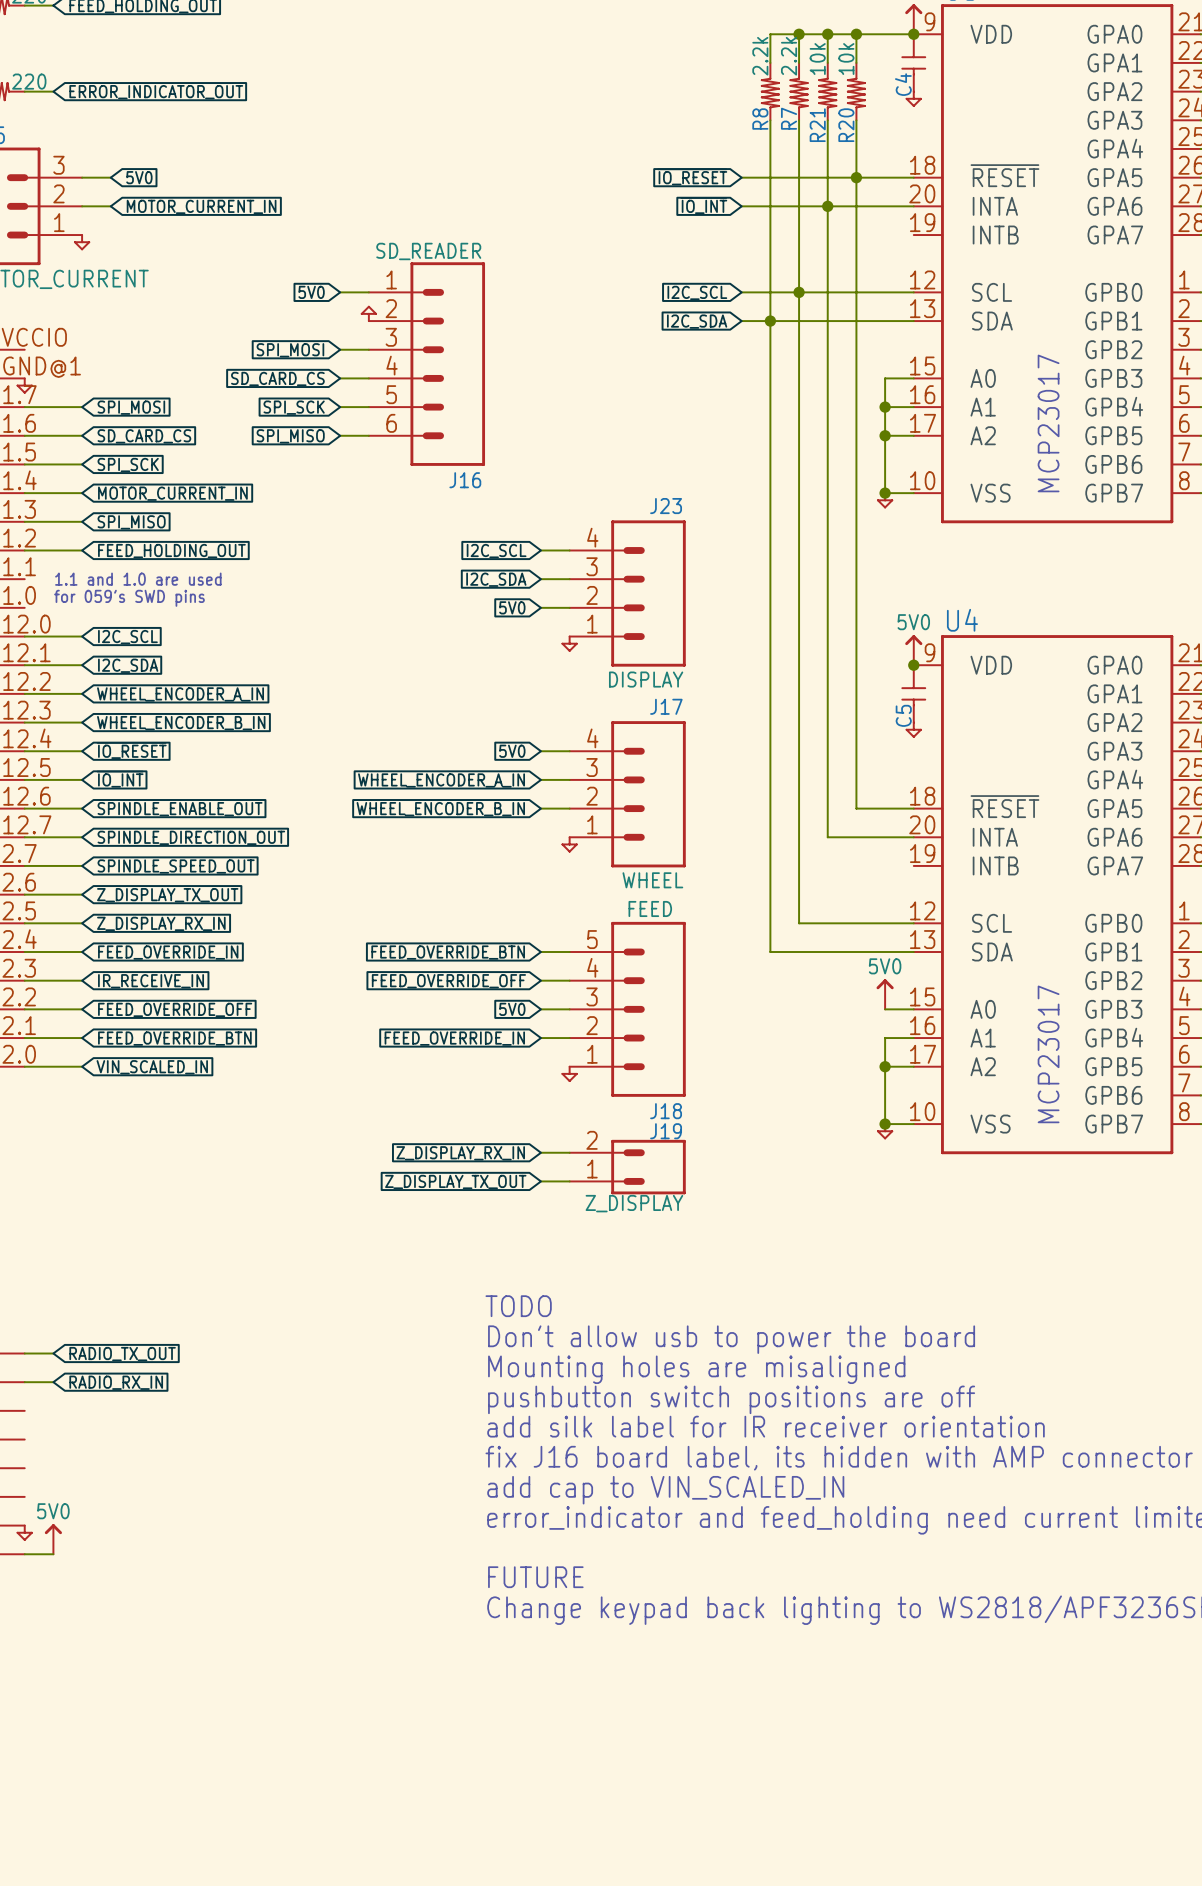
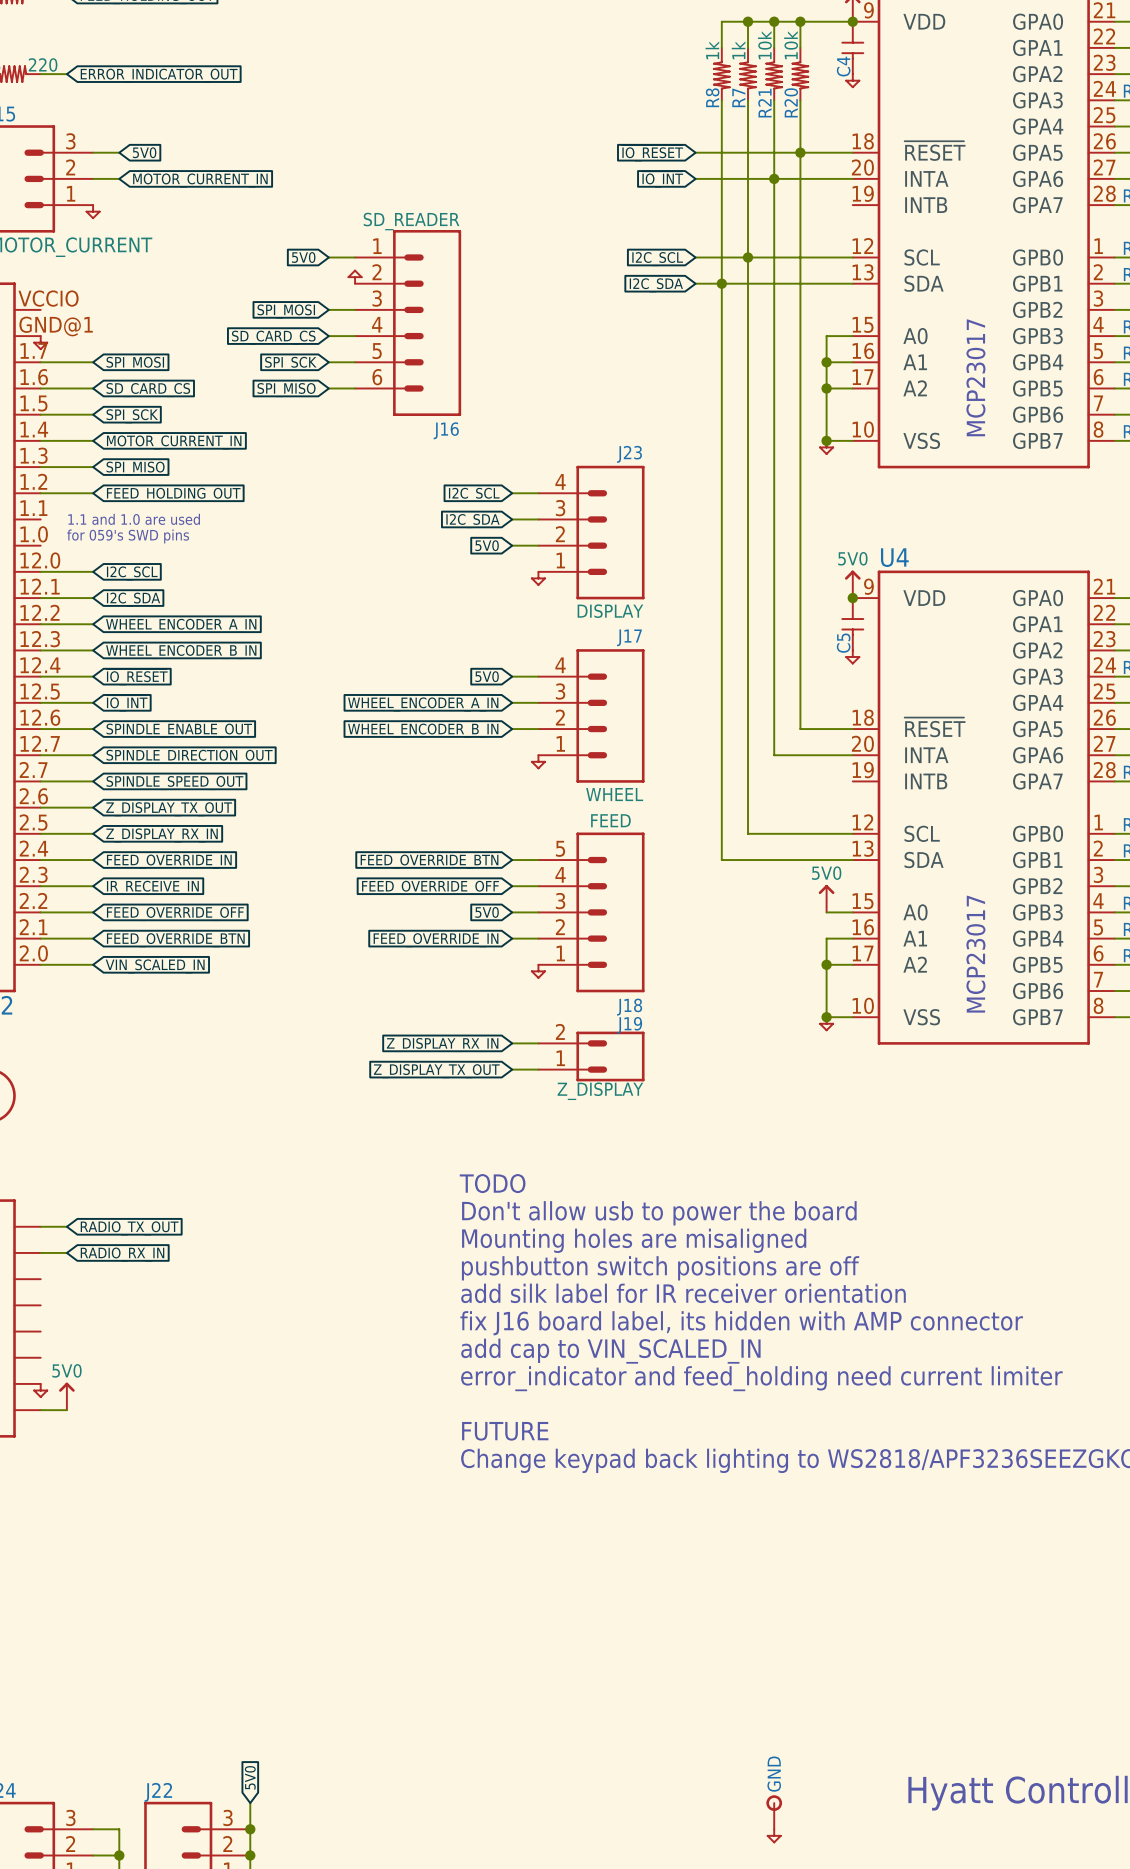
R8 value: 2.2k (760, 56) -> 1k (712, 50)
R7 value: 2.2k (789, 56) -> 1k (738, 50)

